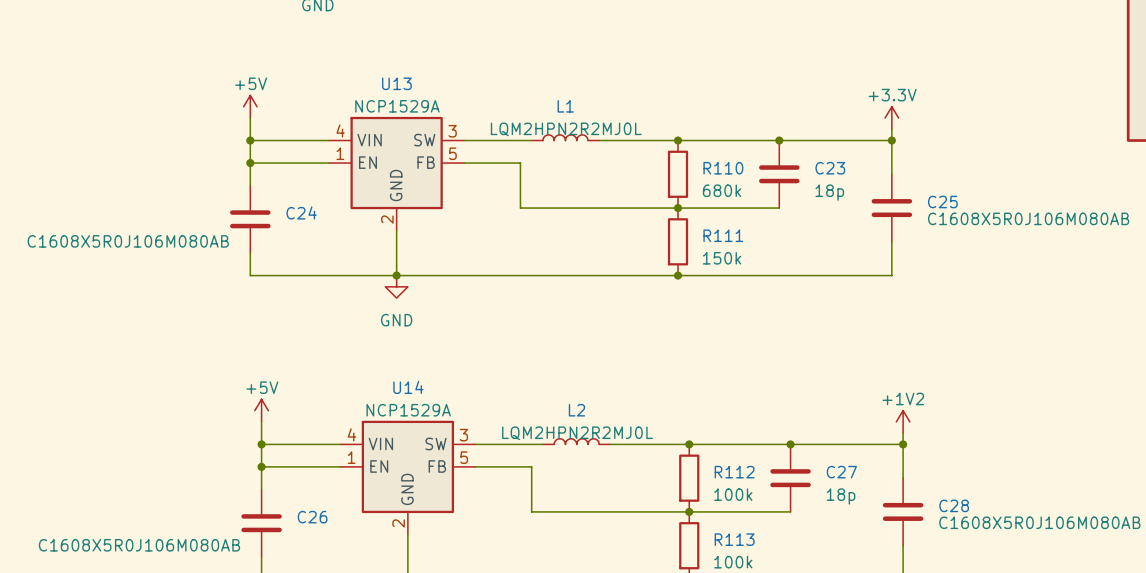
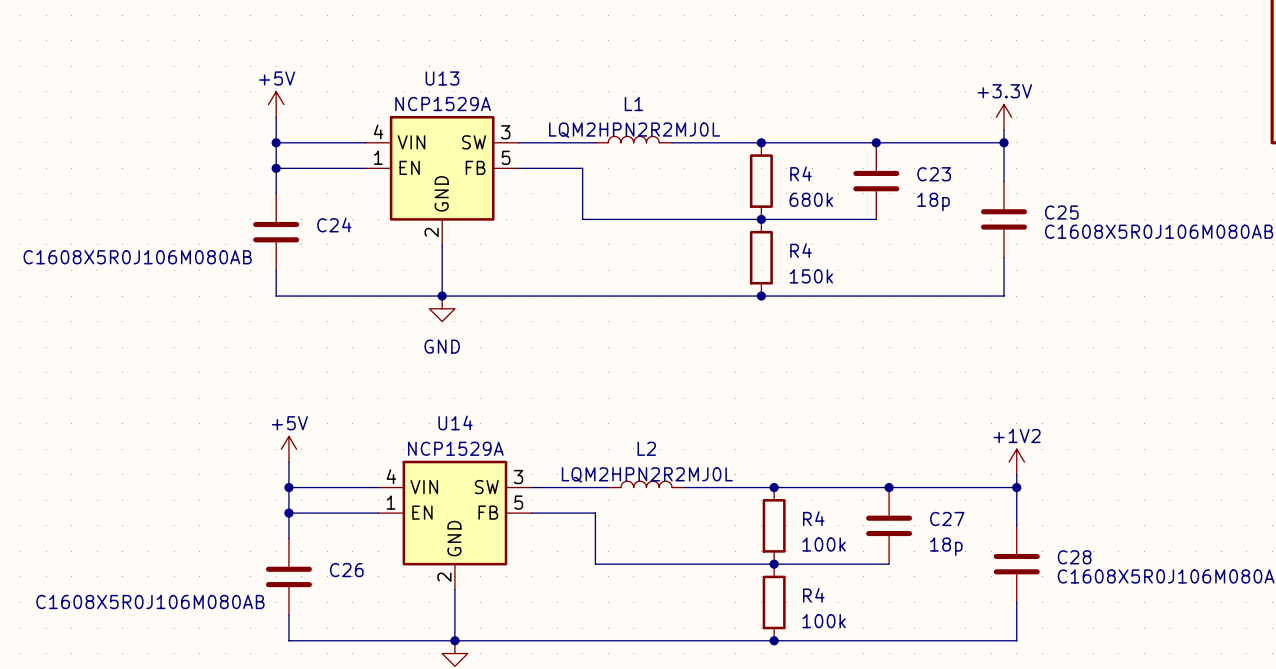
R110 name: R110 (723, 168) -> R4 (801, 173)
R111 name: R111 (723, 235) -> R4 (801, 250)
R112 name: R112 (734, 472) -> R4 (813, 518)
R113 name: R113 (734, 539) -> R4 (813, 595)

